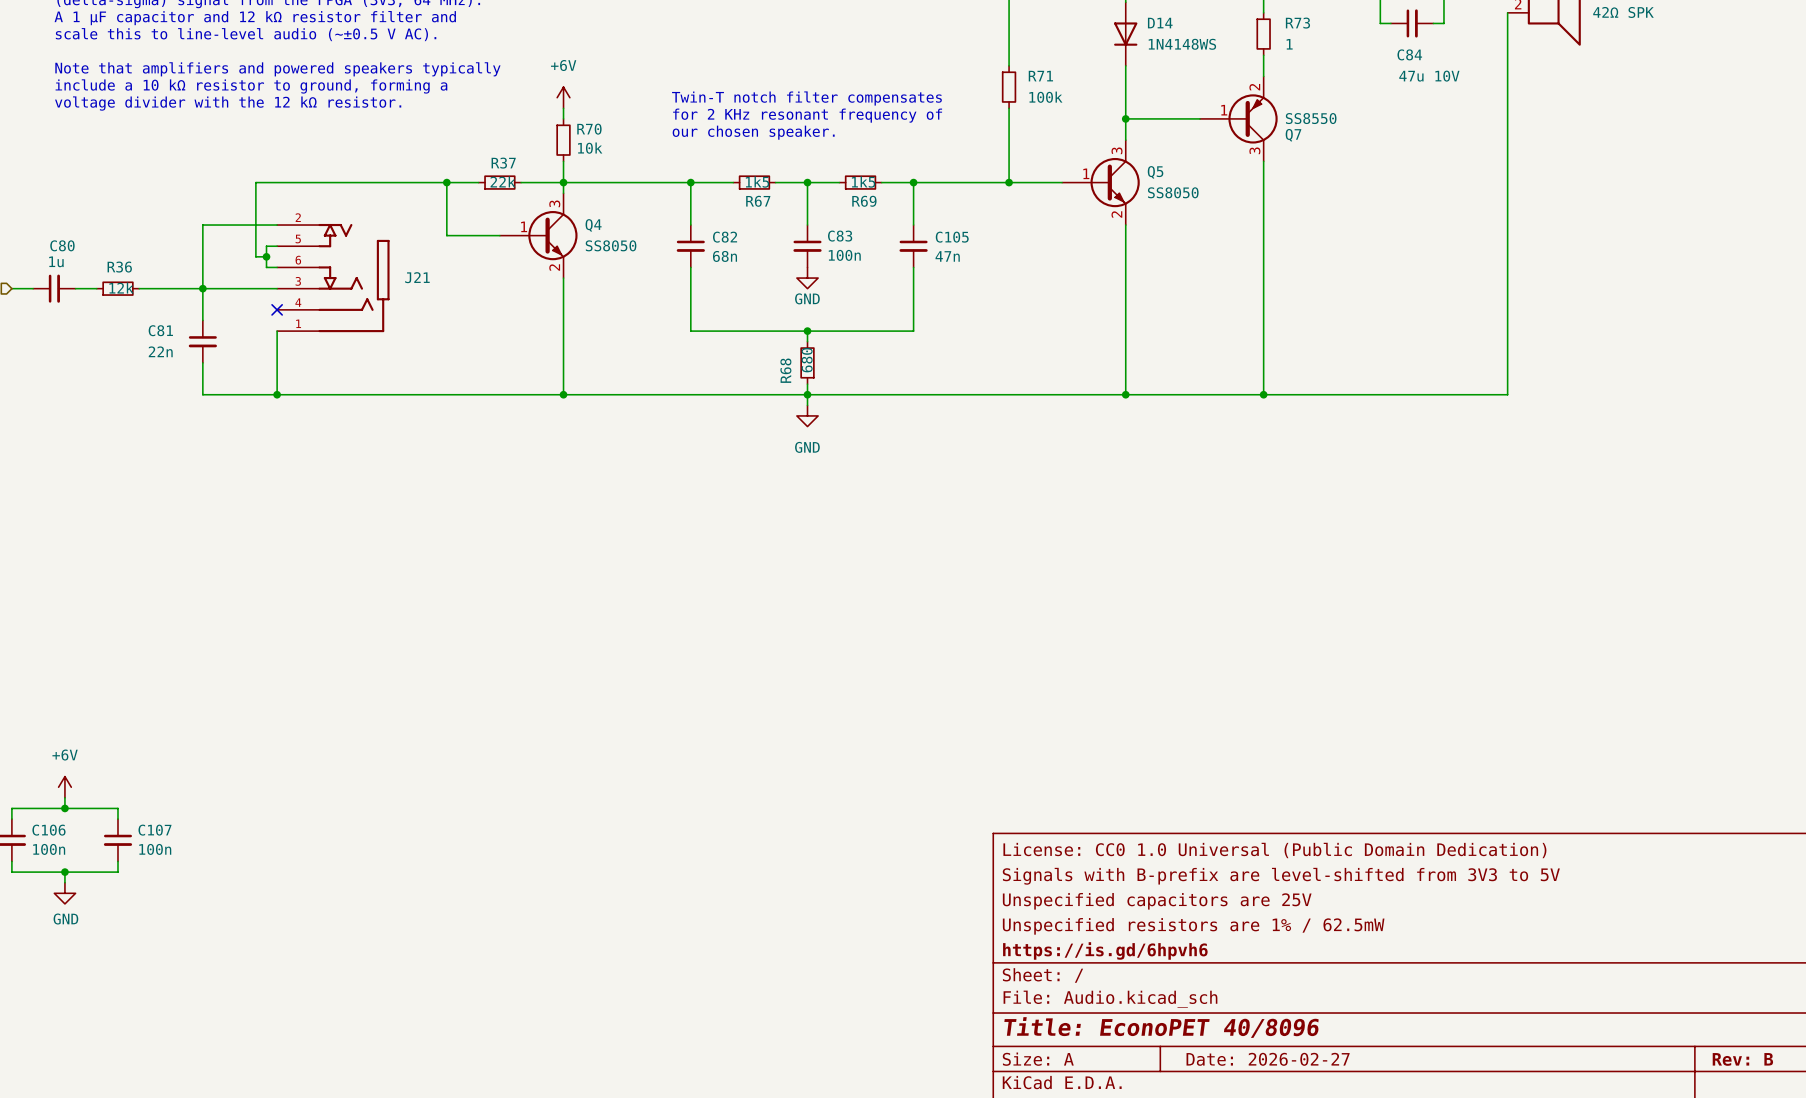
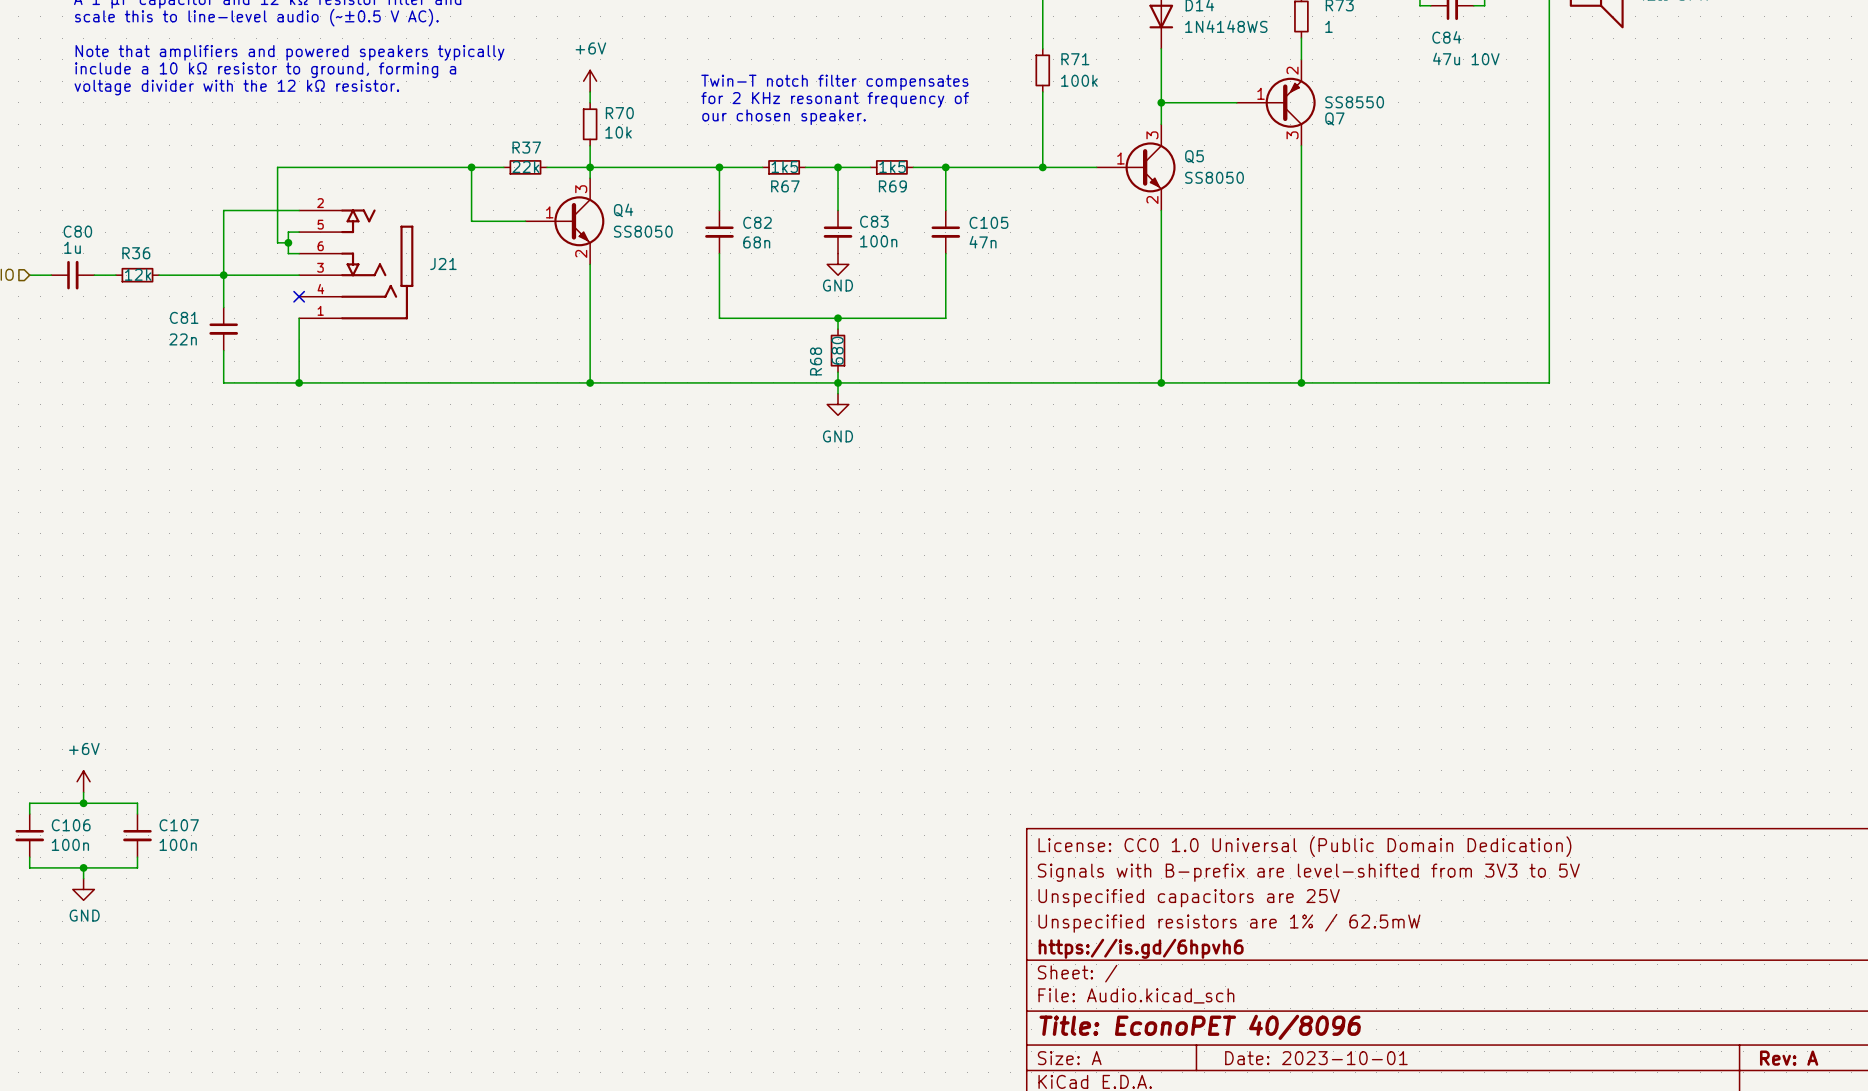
title block: Date: 2026-02-27 (1268, 1059) -> Date: 2023-10-01 (1316, 1058)
title block: Rev: B (1742, 1059) -> Rev: A (1789, 1058)

